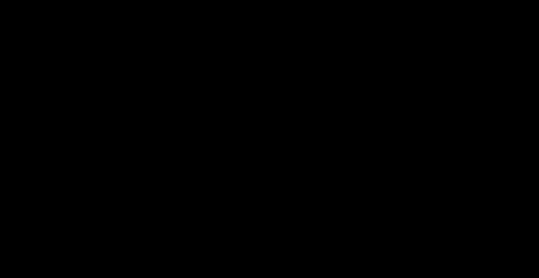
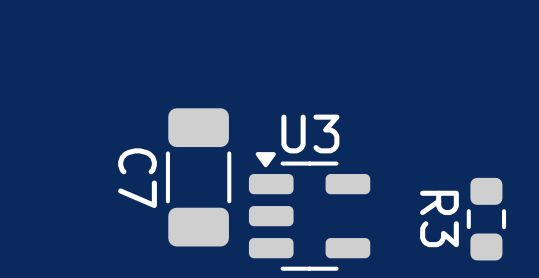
C7: none -> (198, 177)
U3: none -> (309, 211)
R3: none -> (486, 219)

